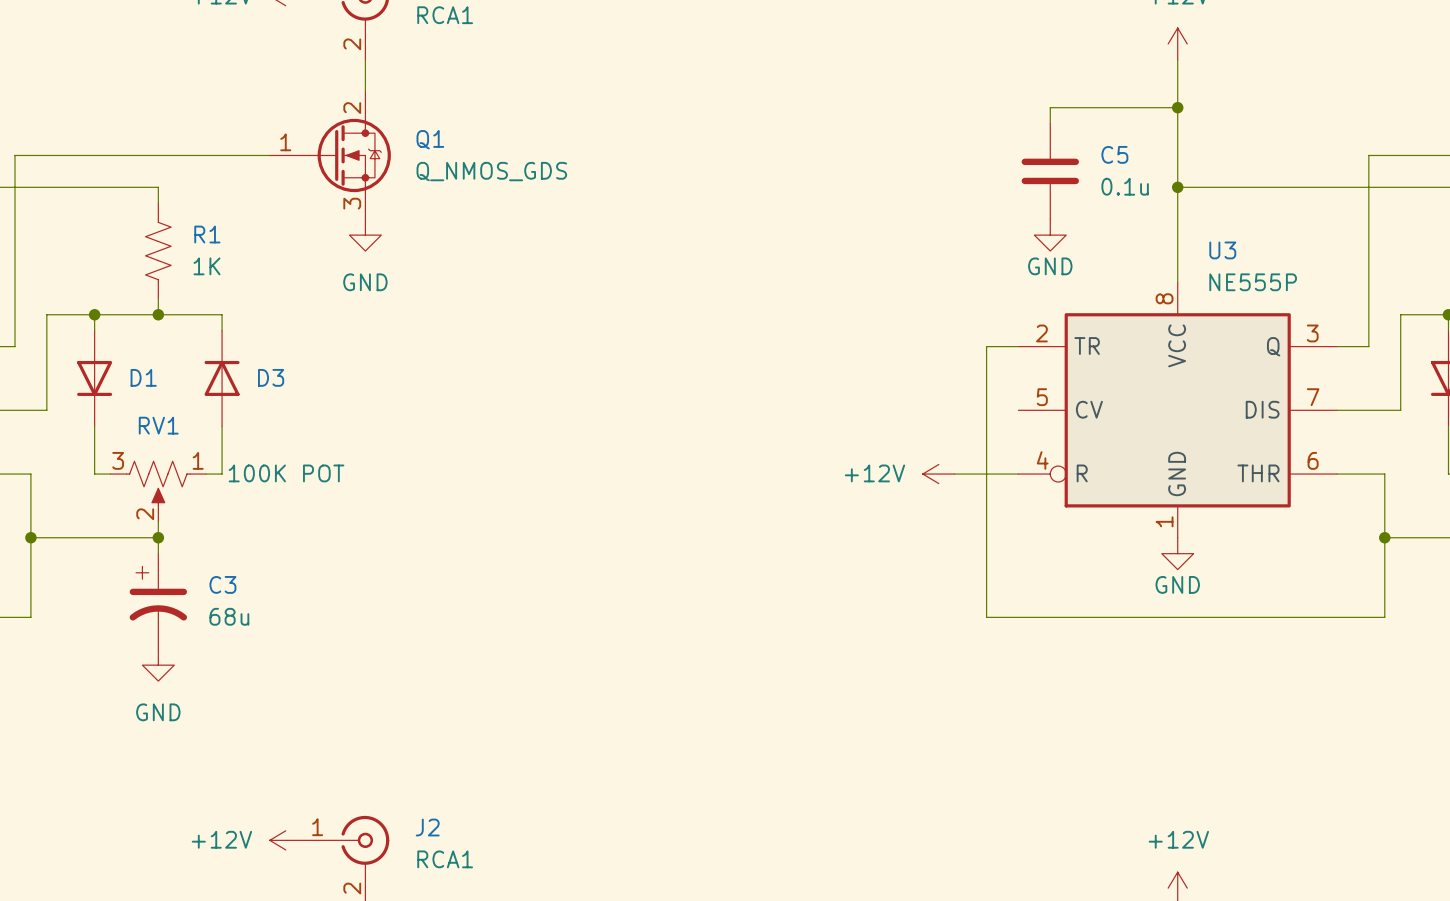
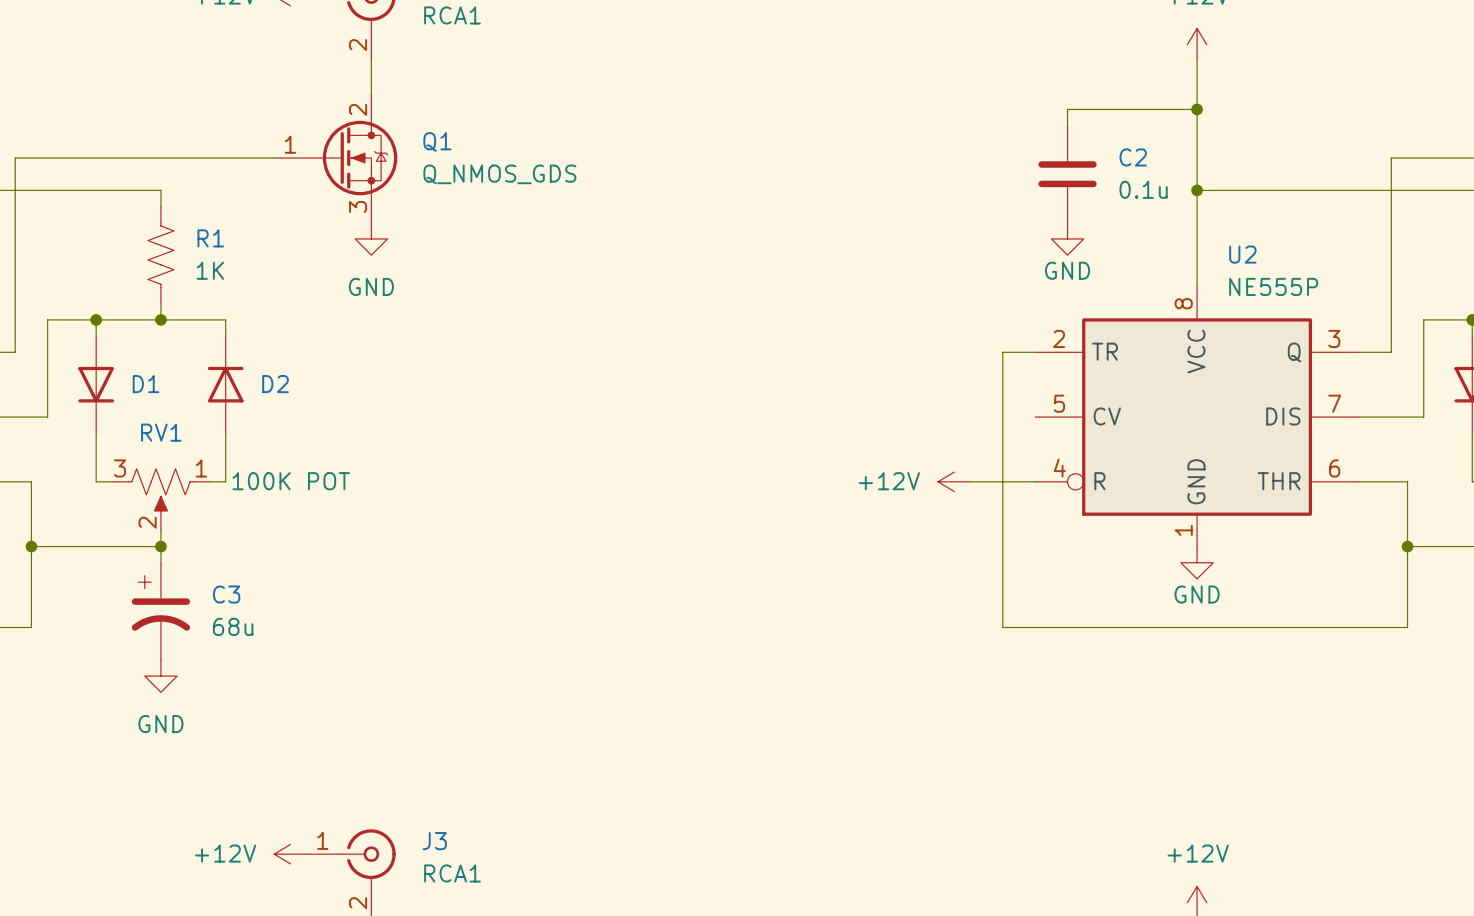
C5 name: C5 (1114, 154) -> C2 (1133, 157)
U3 name: U3 (1222, 250) -> U2 (1242, 254)
D3 name: D3 (271, 377) -> D2 (275, 384)
J2 name: J2 (427, 827) -> J3 (434, 841)

